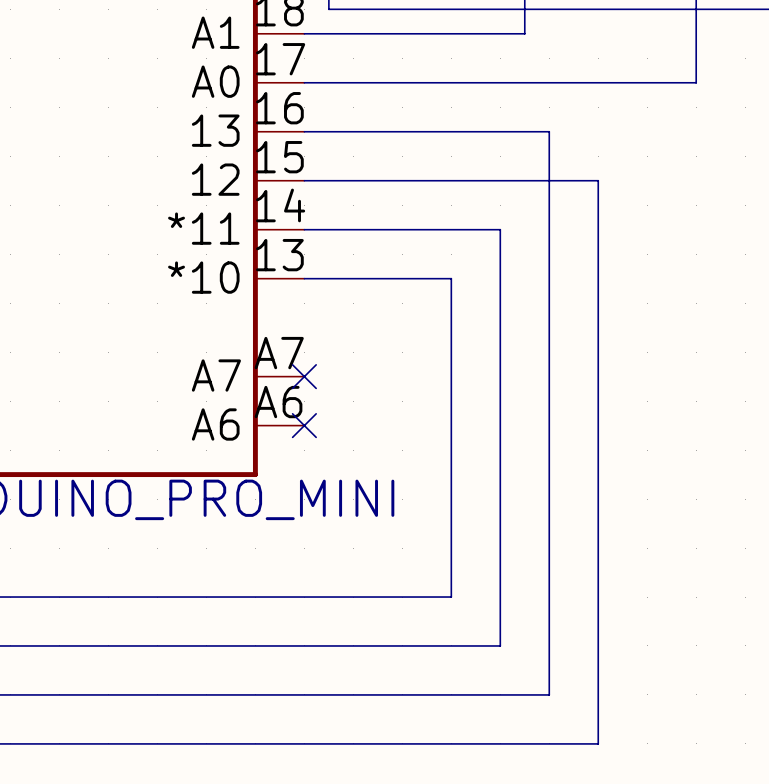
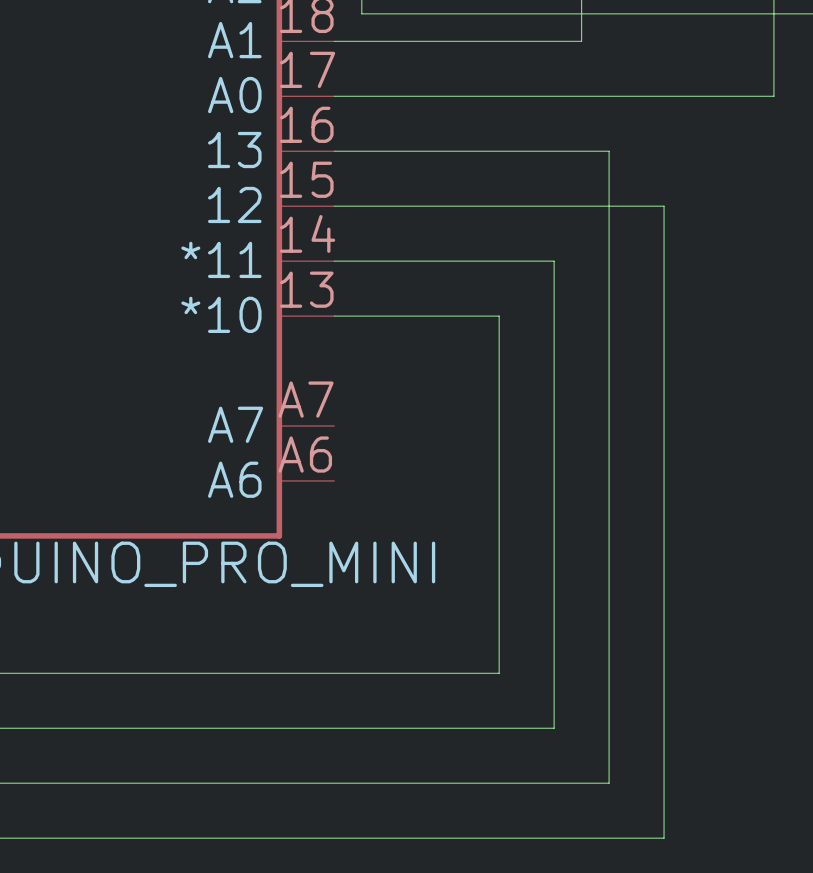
no-connect mark: (304, 376) -> none
no-connect mark: (304, 425) -> none

